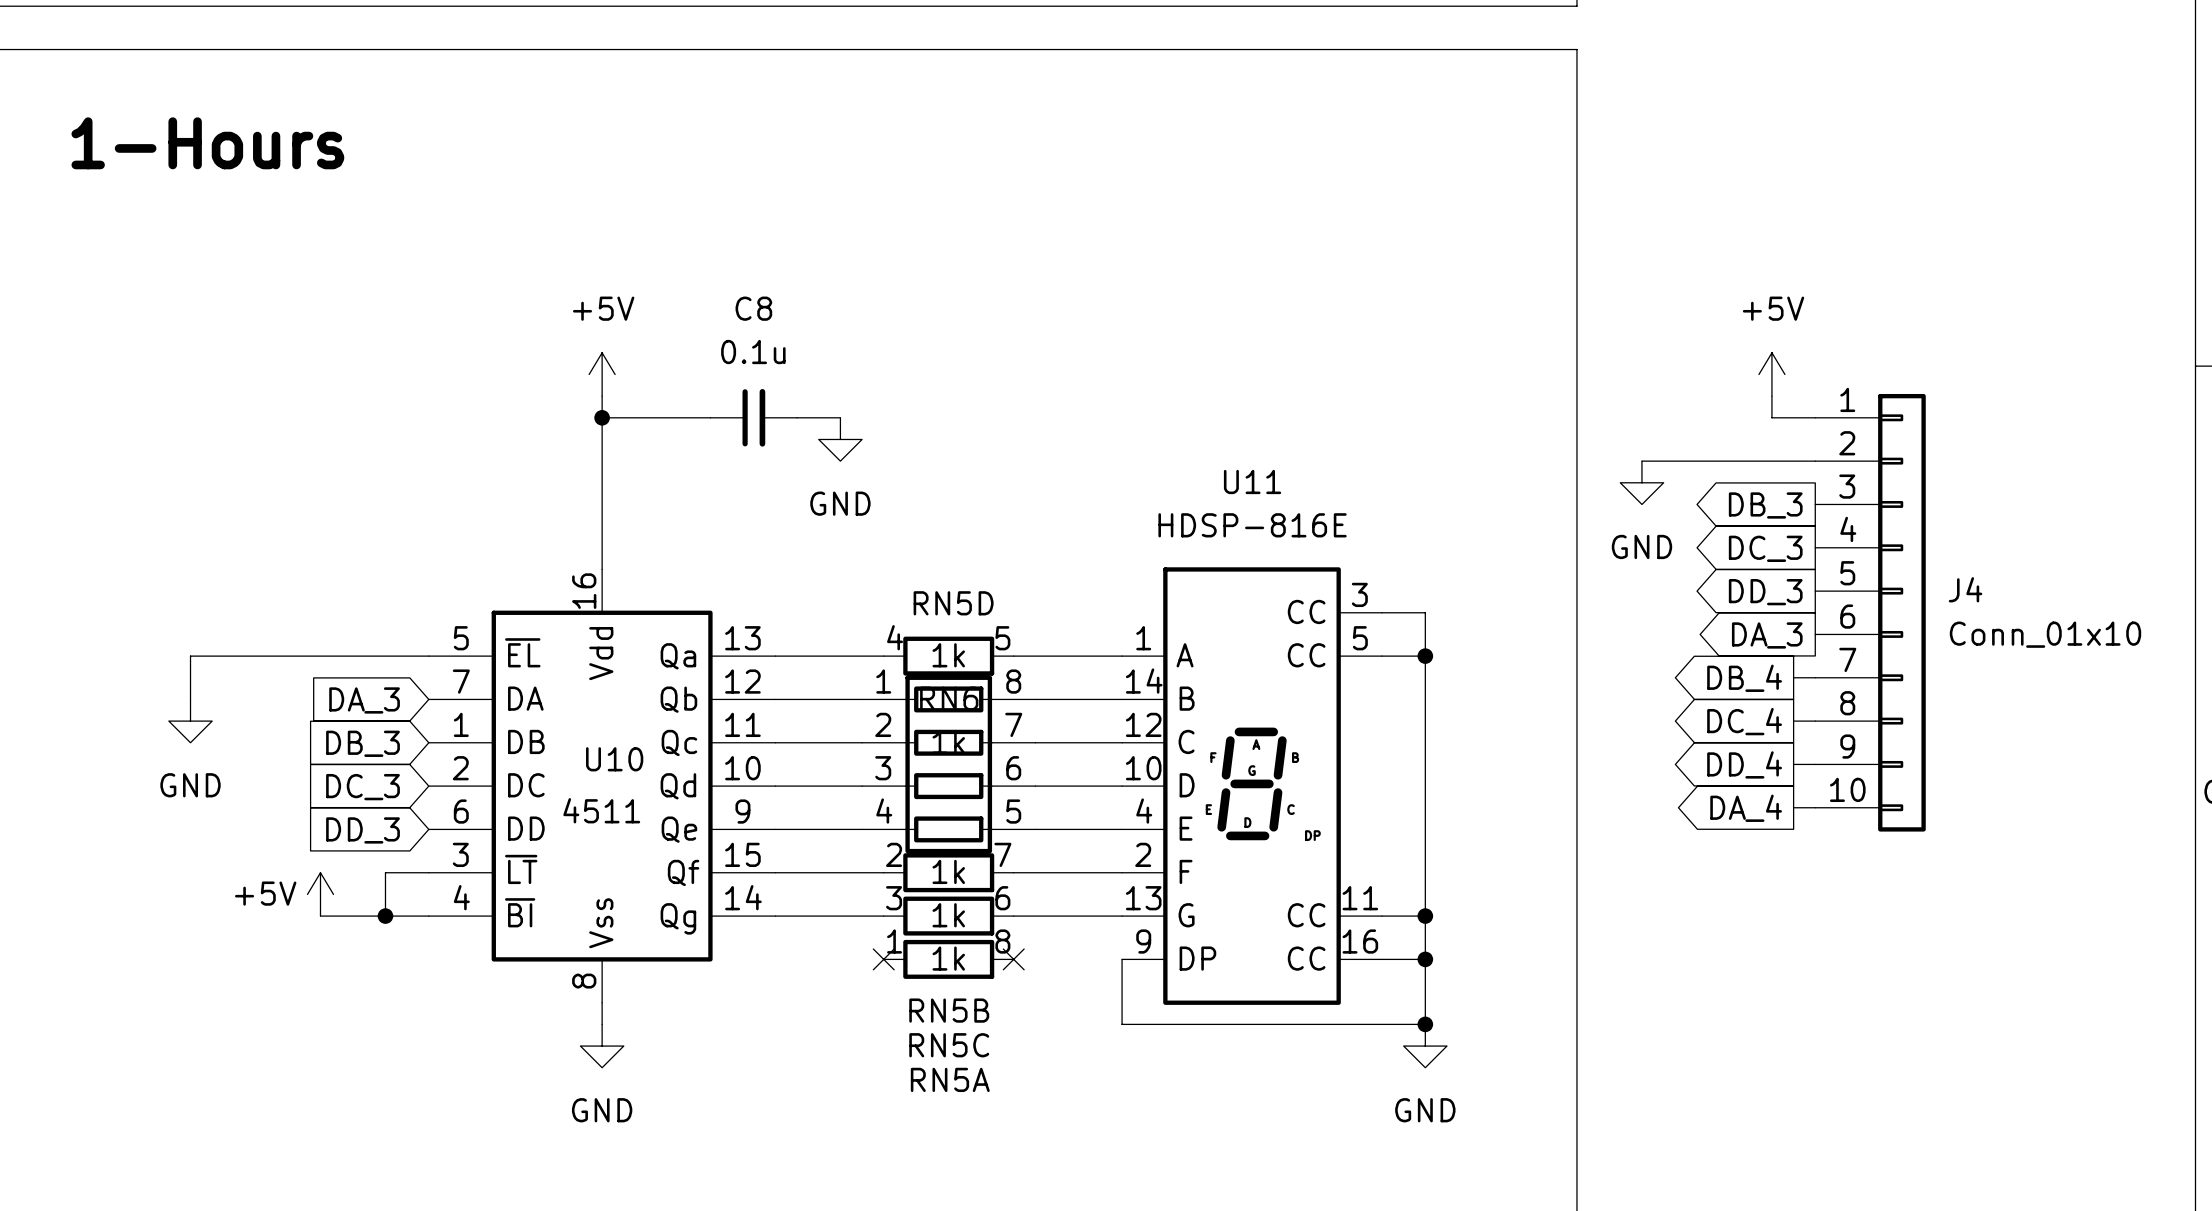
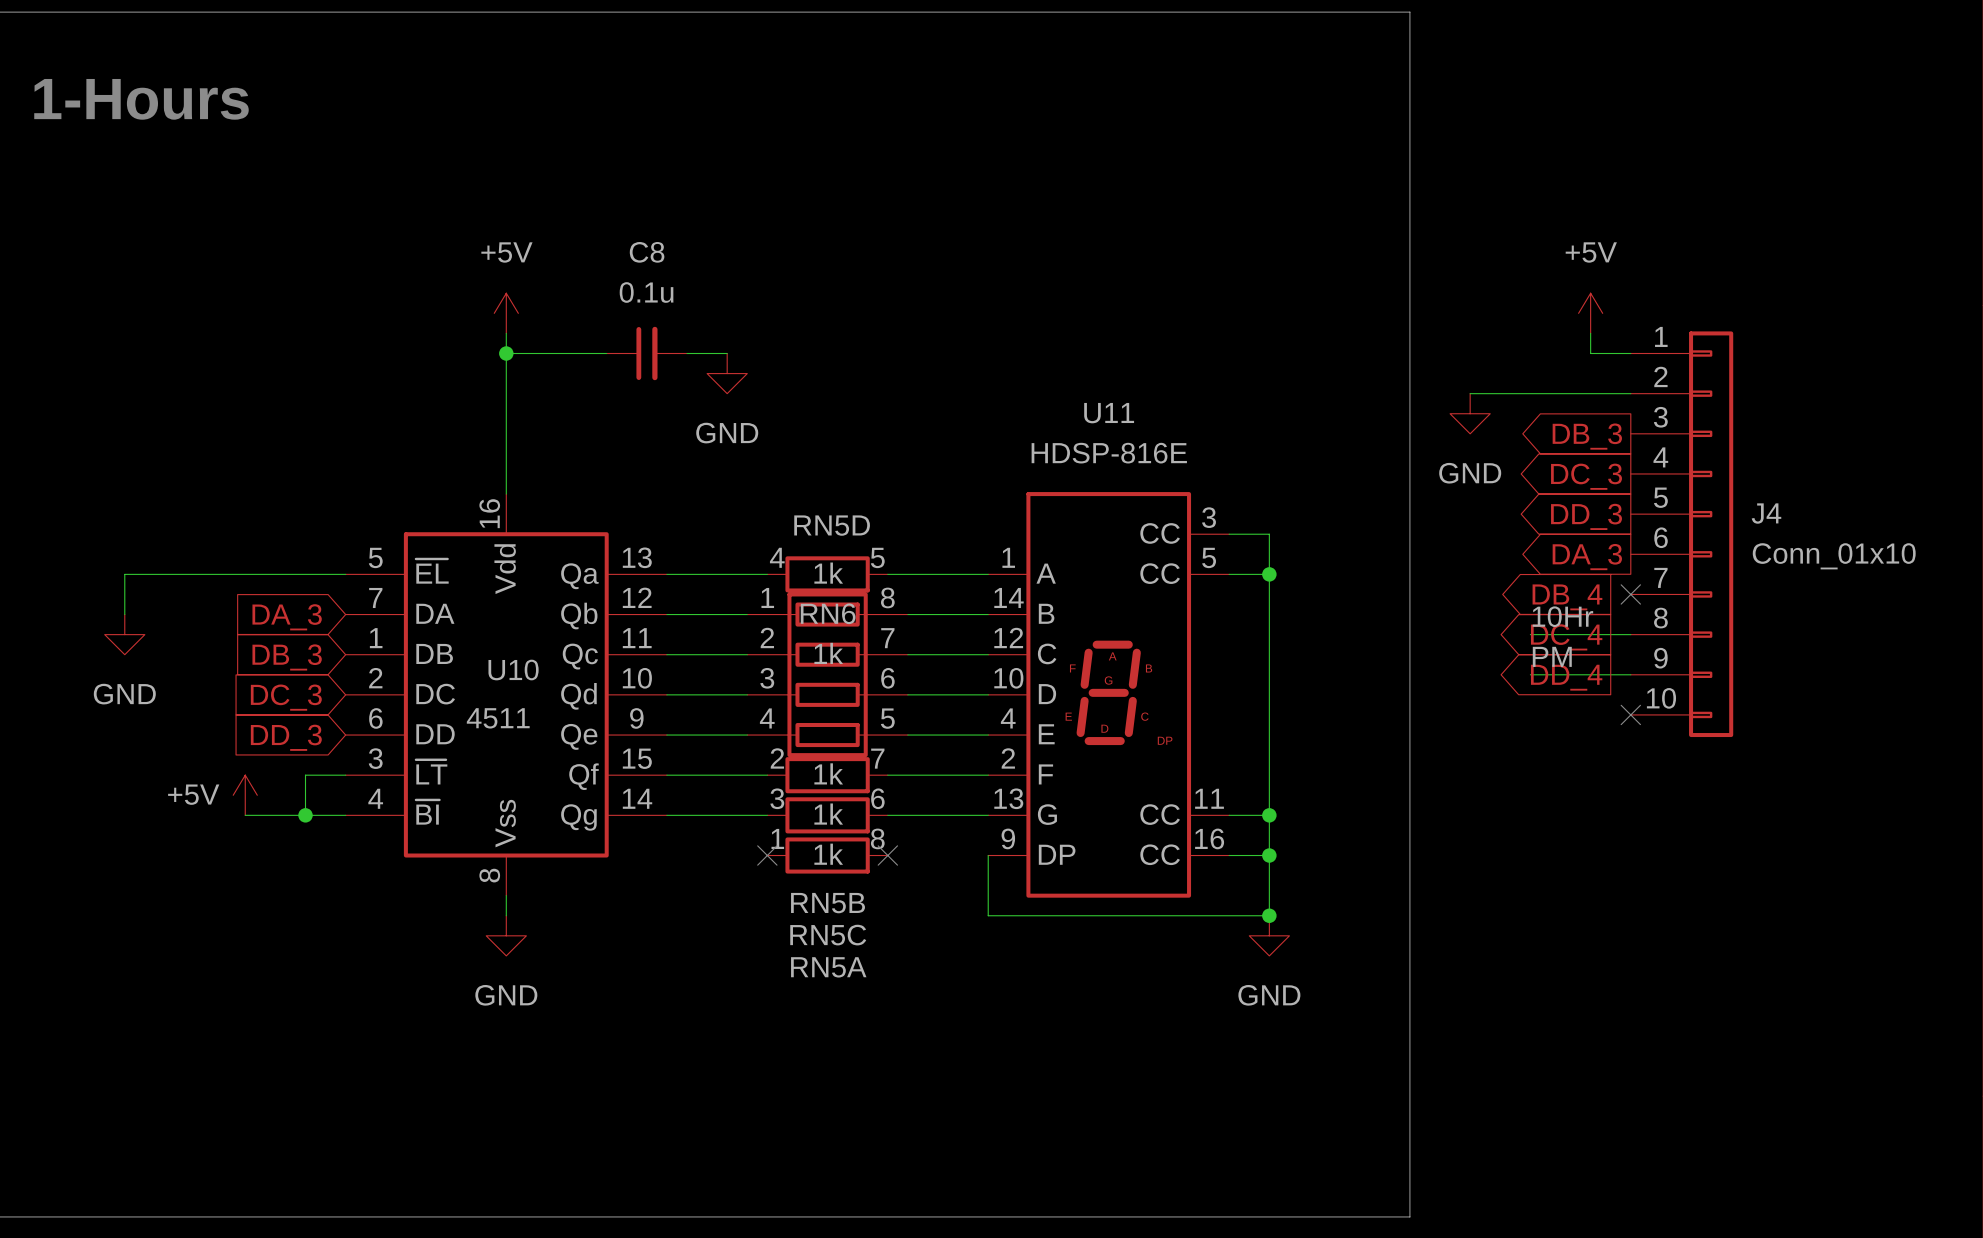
wire: (1793, 677) (1815, 677) -> none
no-connect mark: none -> (1630, 594)
label: none -> 10Hr (1562, 616)
wire: none -> (1530, 634) (1610, 634)
label: none -> PM (1552, 656)
wire: none -> (1530, 674) (1610, 674)
wire: (1793, 807) (1815, 807) -> none
no-connect mark: none -> (1630, 714)
global label: DA_4 (1746, 808) -> none

